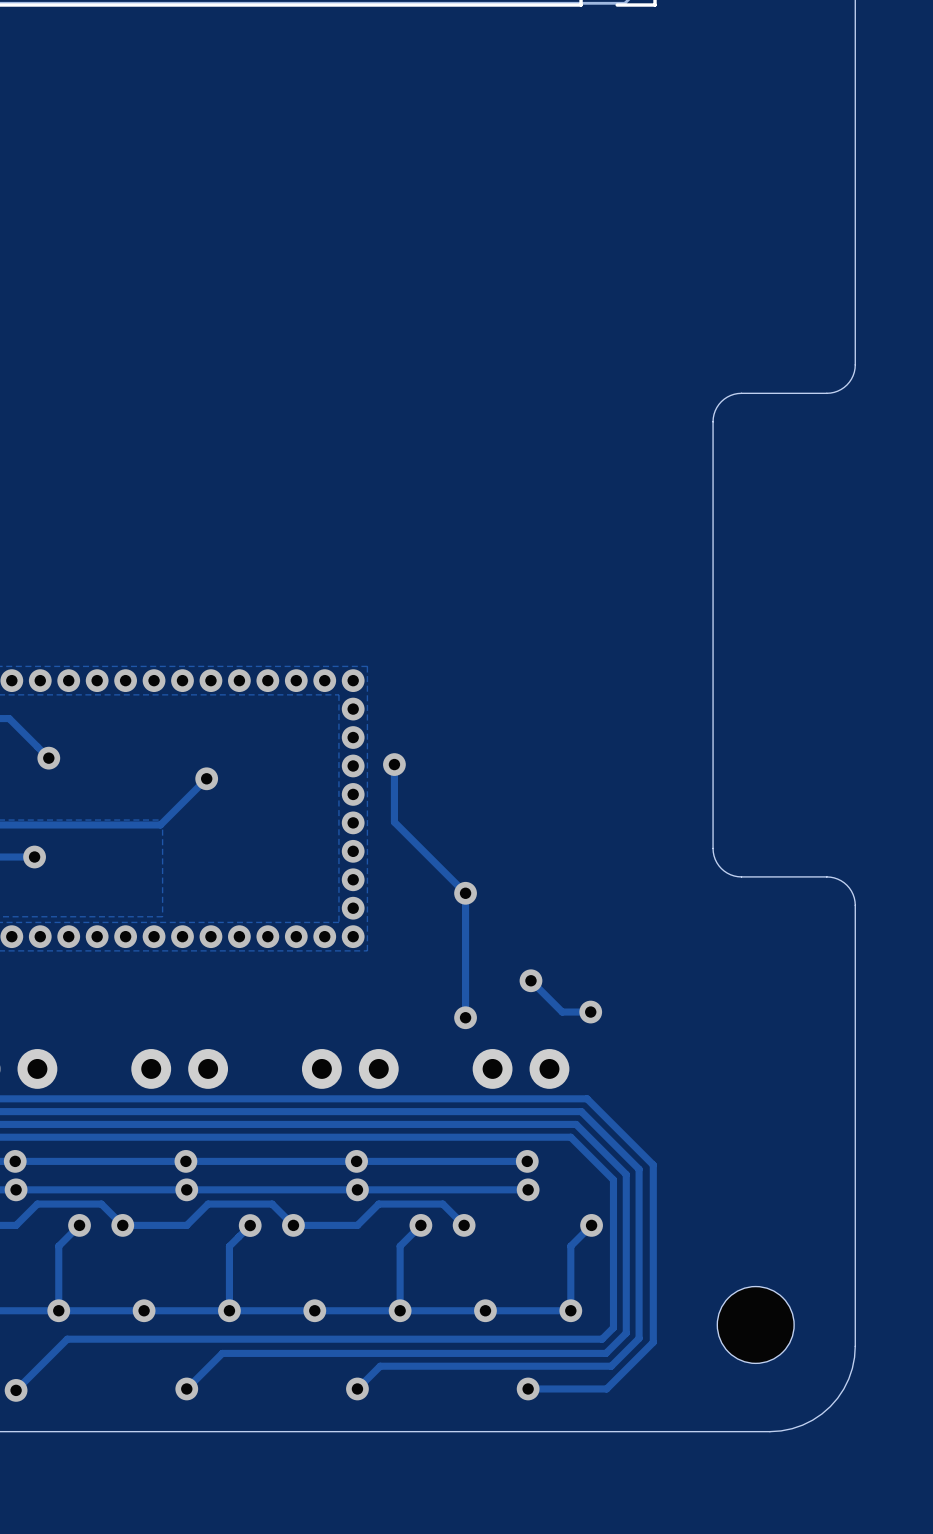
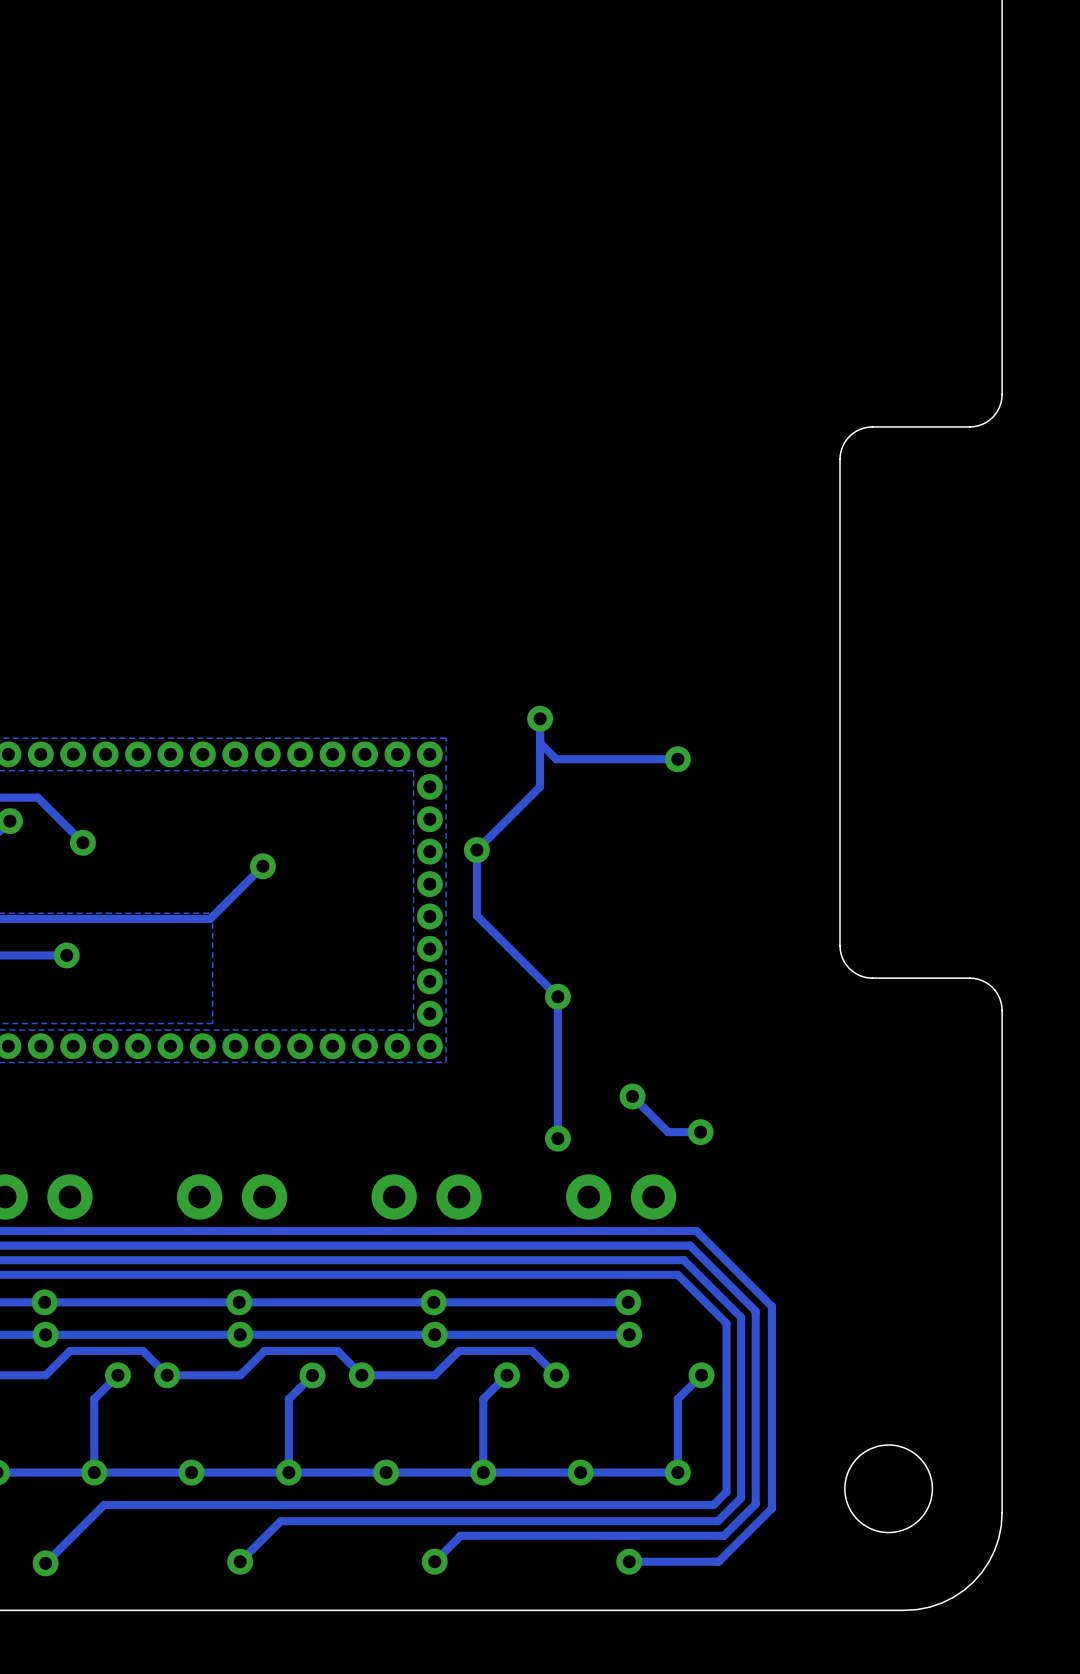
track: none -> (540, 718) (540, 786) (476, 850)
via: none -> (540, 718)
track: none -> (540, 743) (556, 759) (677, 759)
via: none -> (677, 759)

